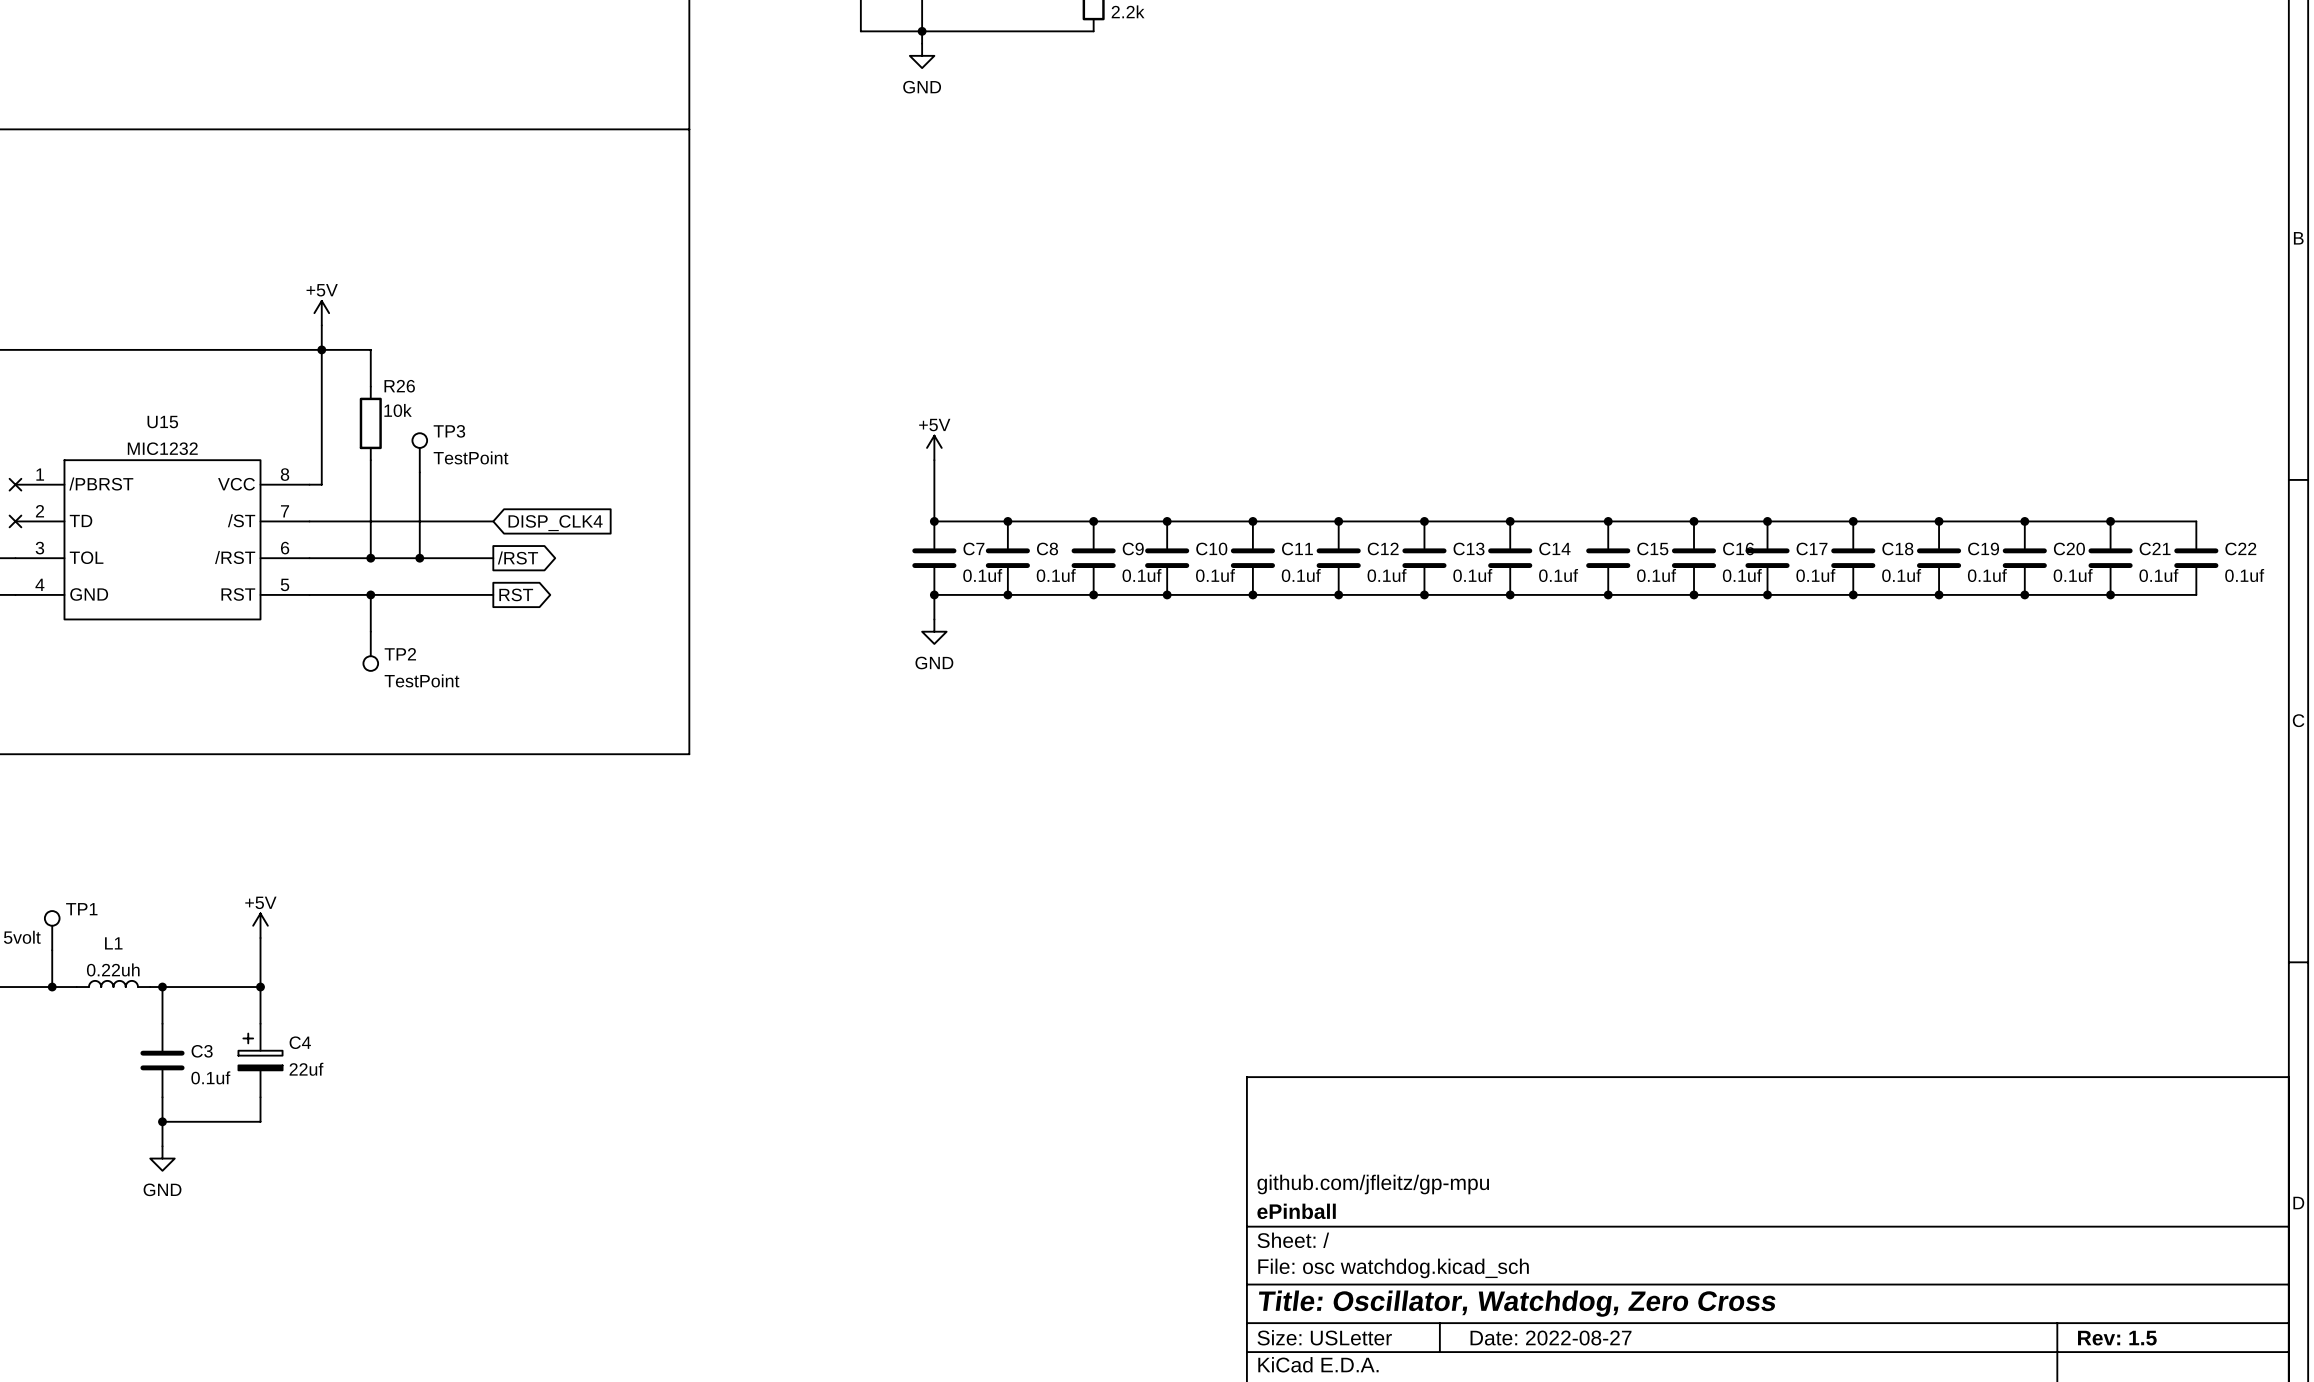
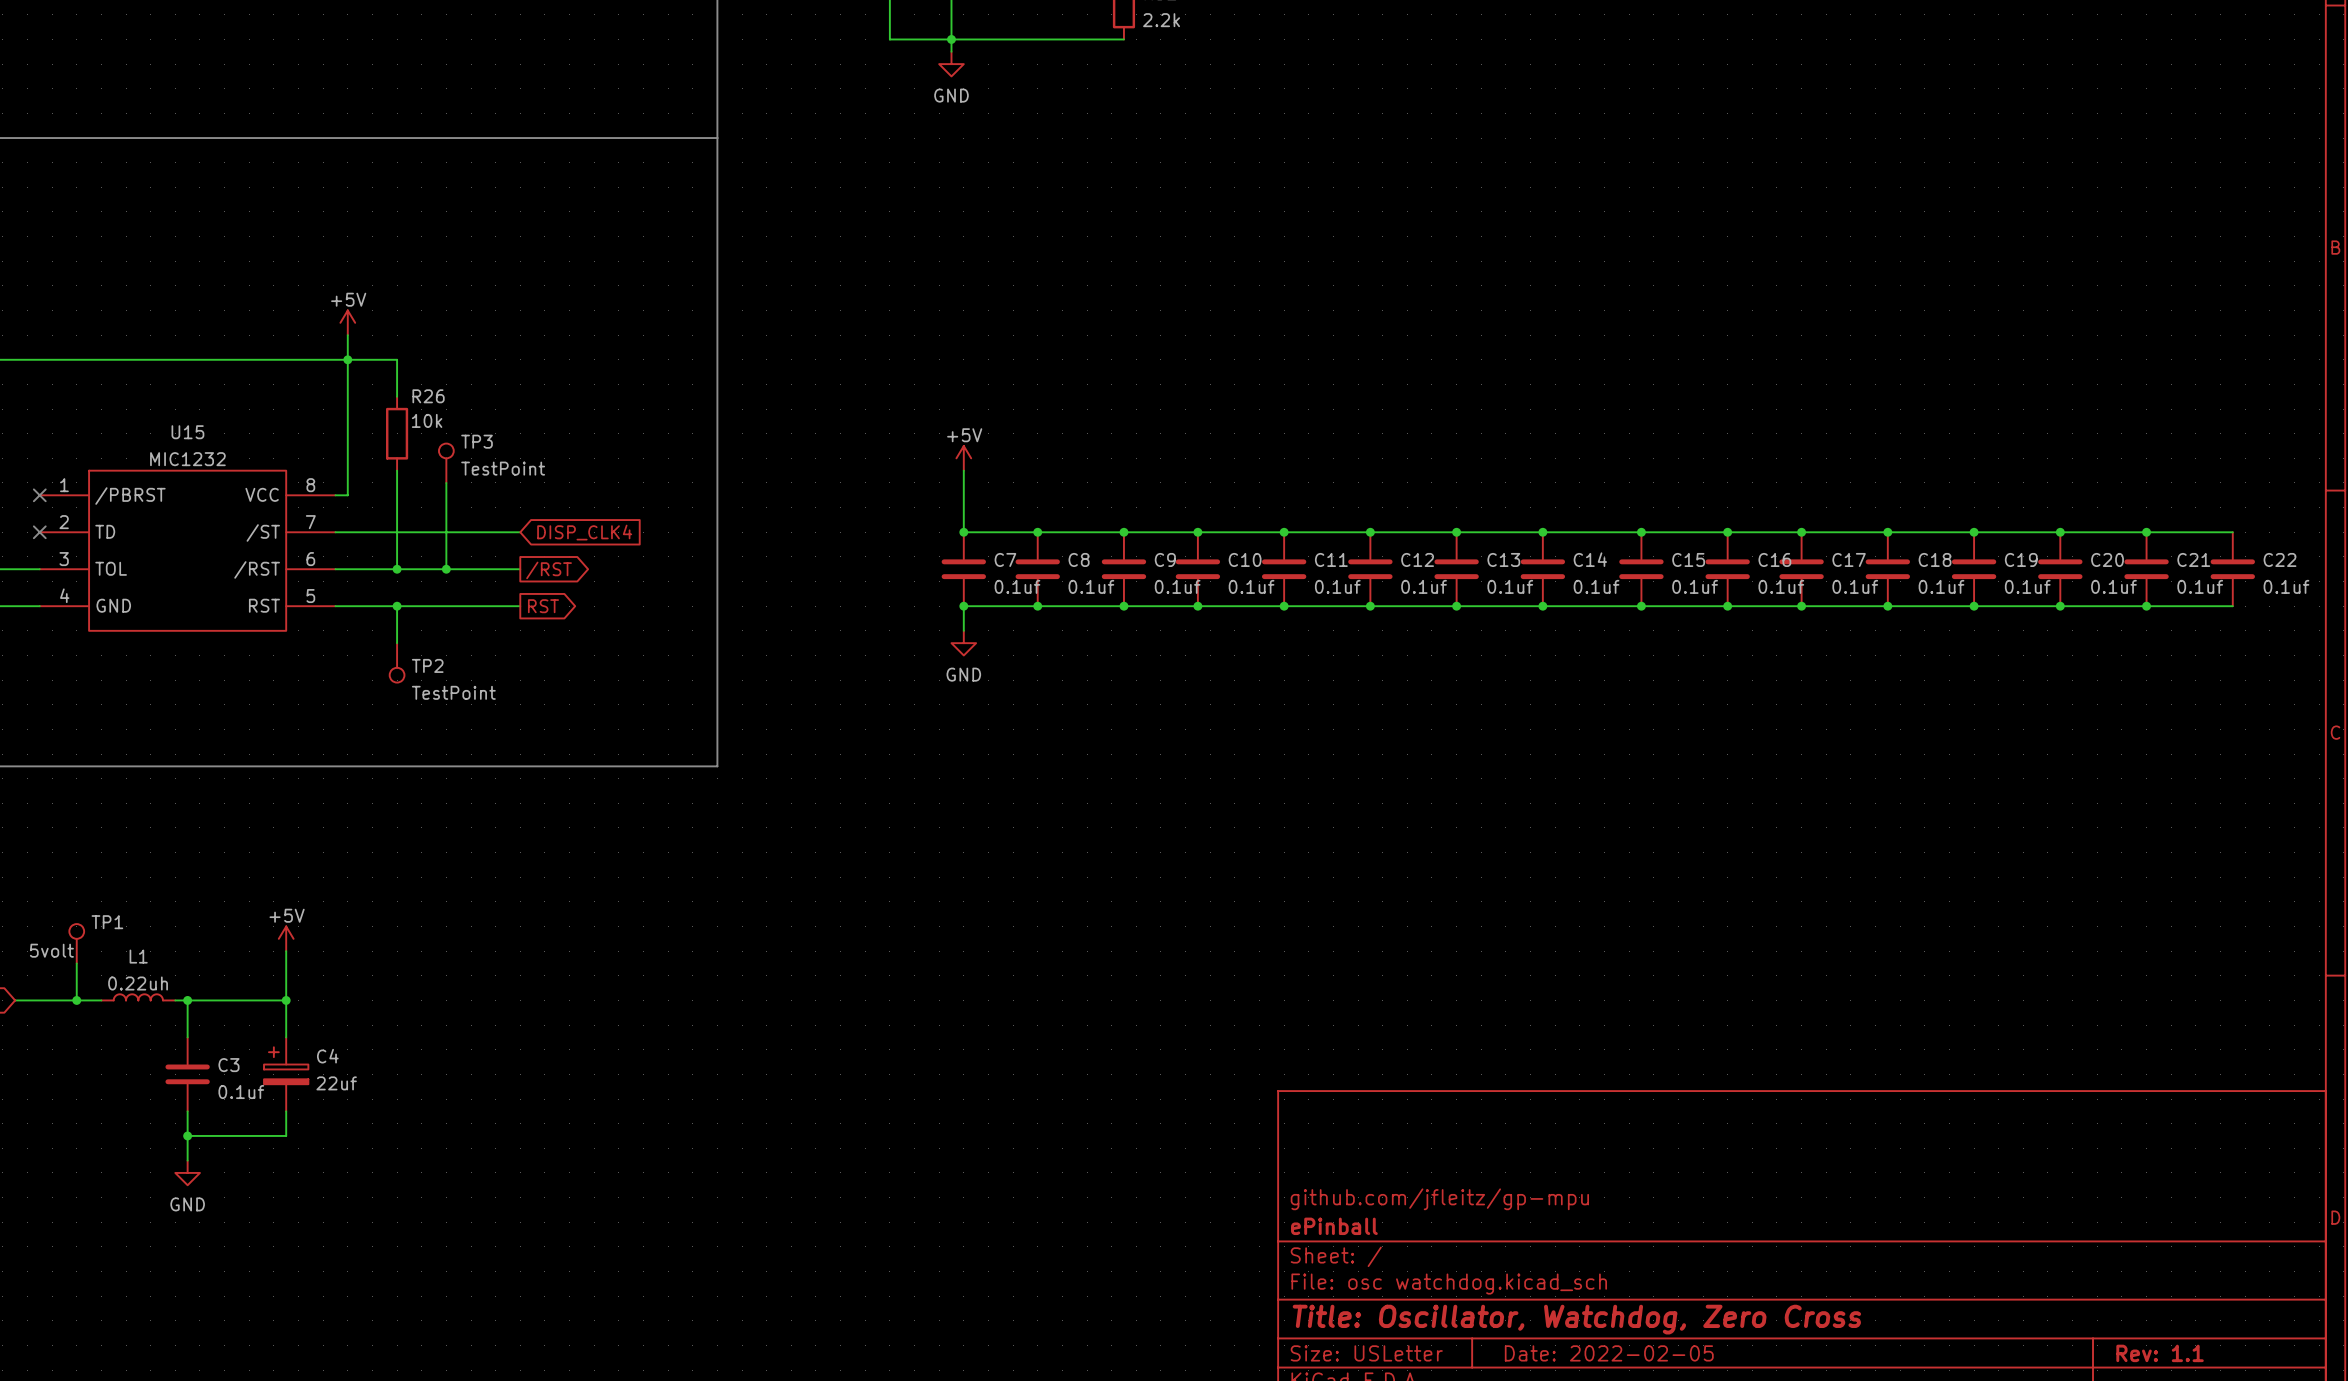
title block: Date: 2022-08-27 (1551, 1338) -> Date: 2022-02-05 (1609, 1353)
title block: Rev: 1.5 (2117, 1338) -> Rev: 1.1 (2160, 1353)

